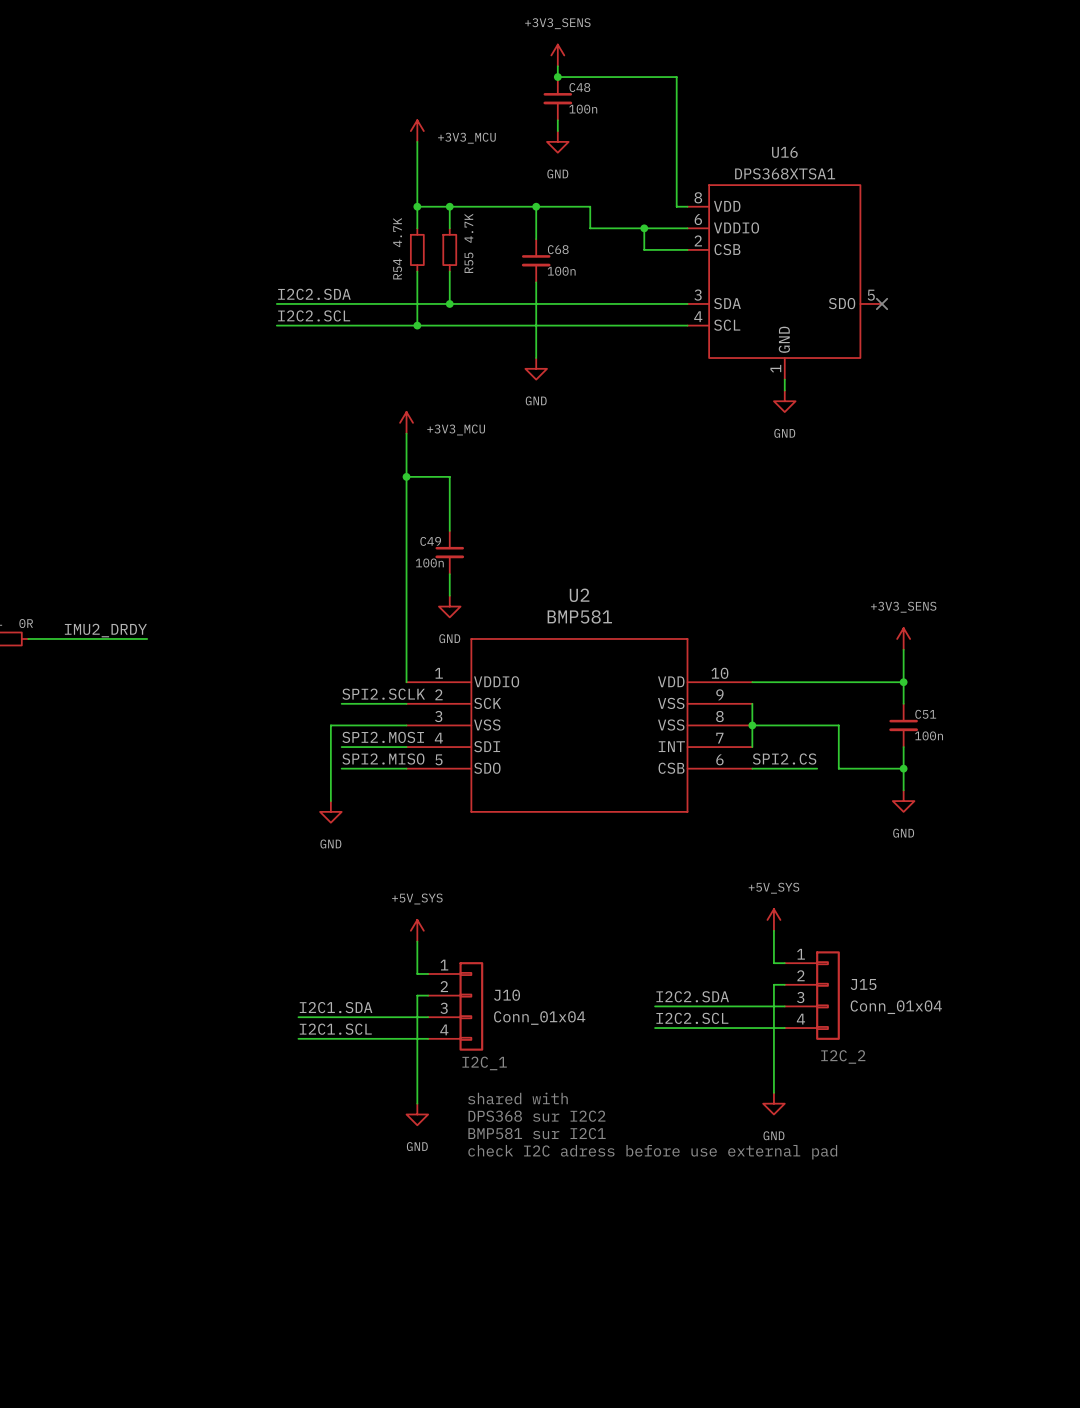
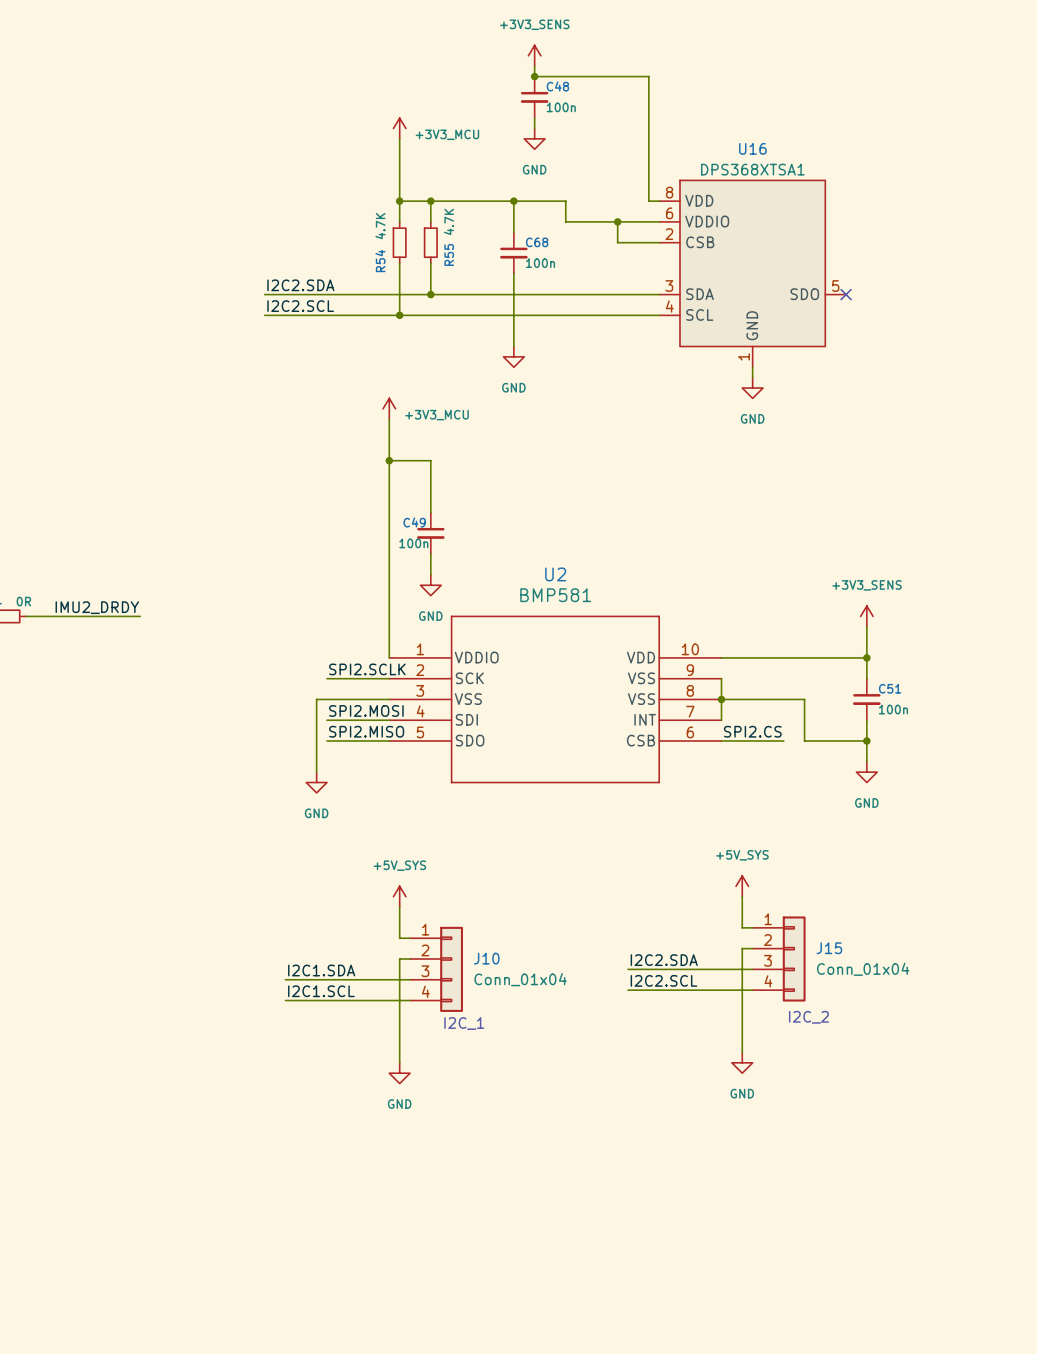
text: shared with (517, 1098) -> none
text: DPS368 sur I2C2 (536, 1116) -> none
text: BMP581 sur I2C1 (537, 1133) -> none
text: check I2C adress before use external pad (652, 1152) -> none

